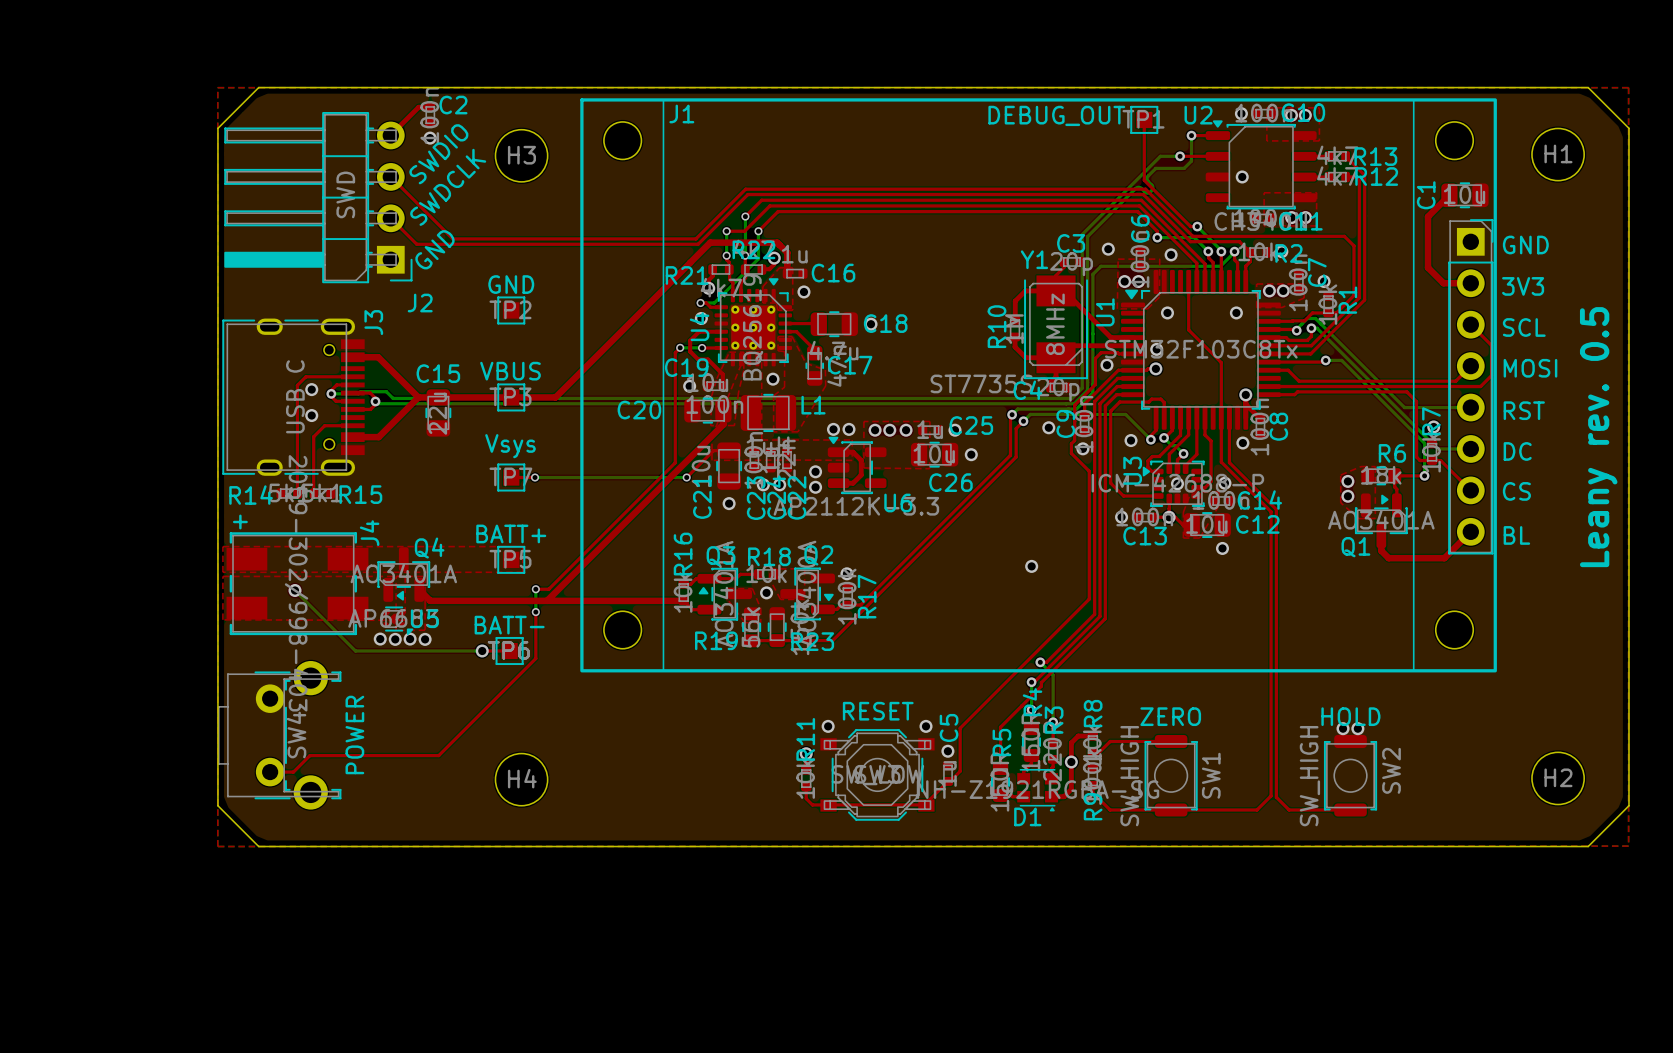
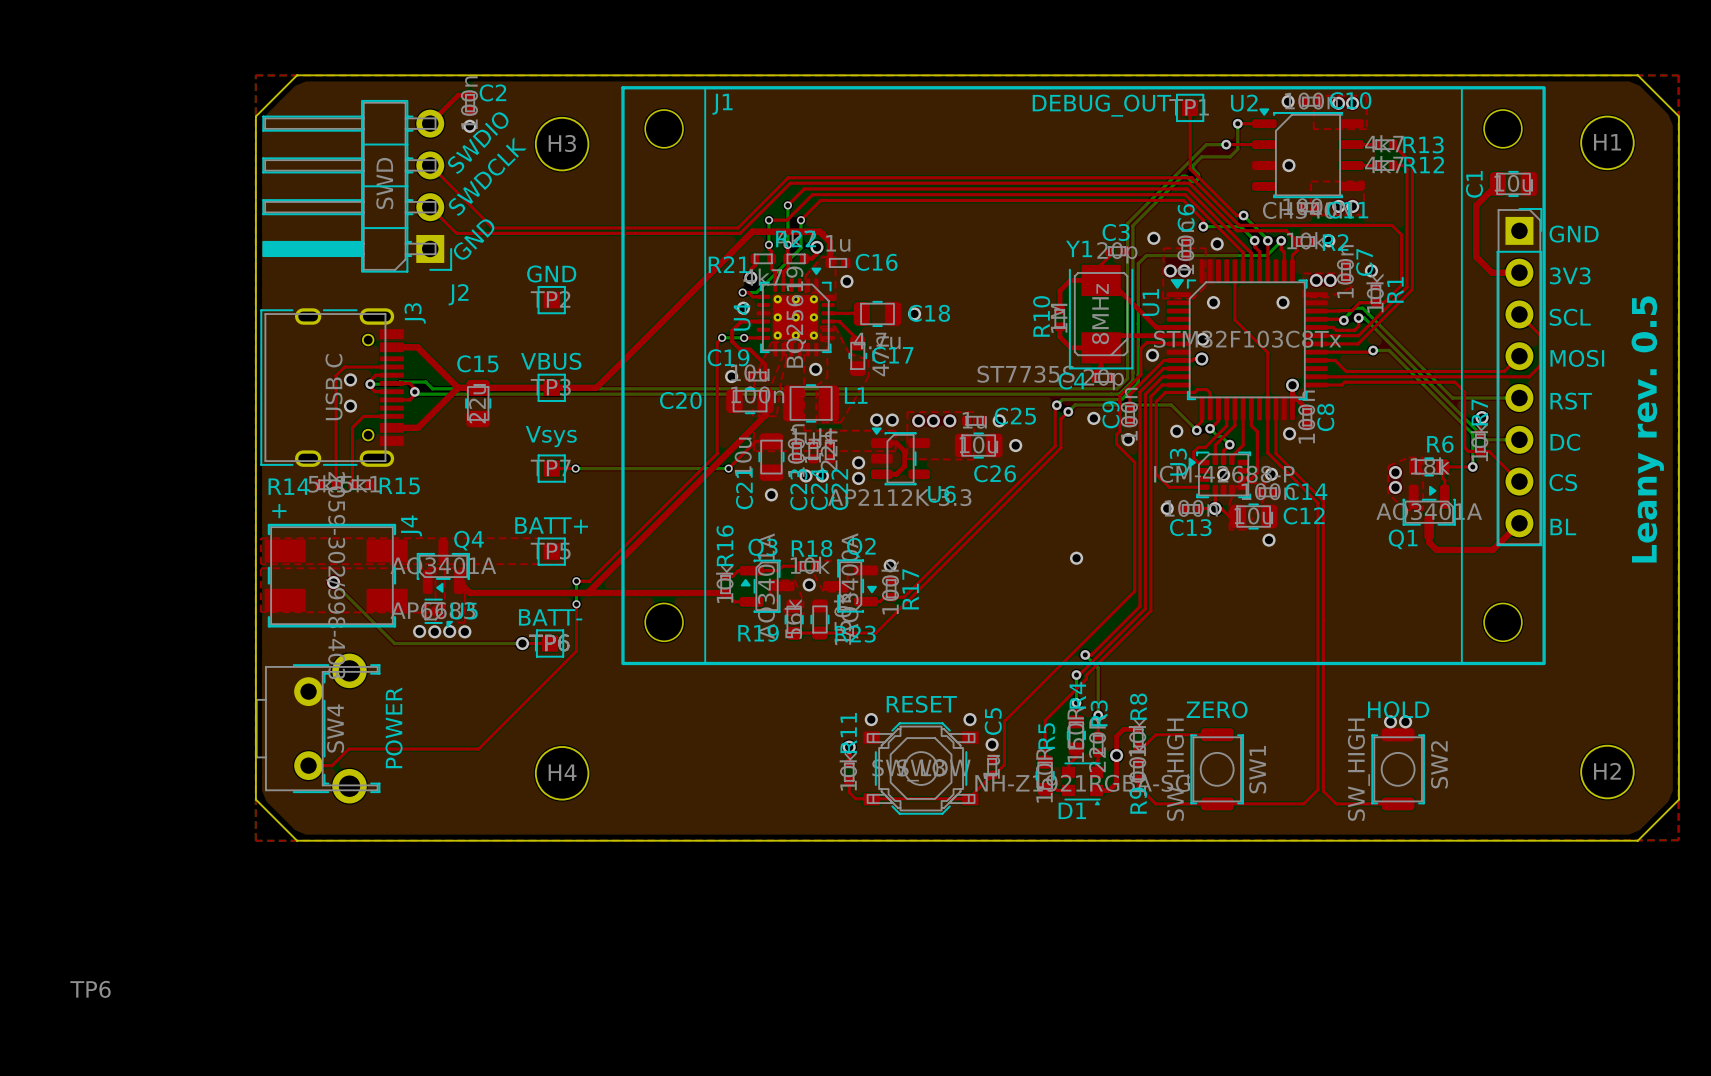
text: none -> TP6 (90, 989)

